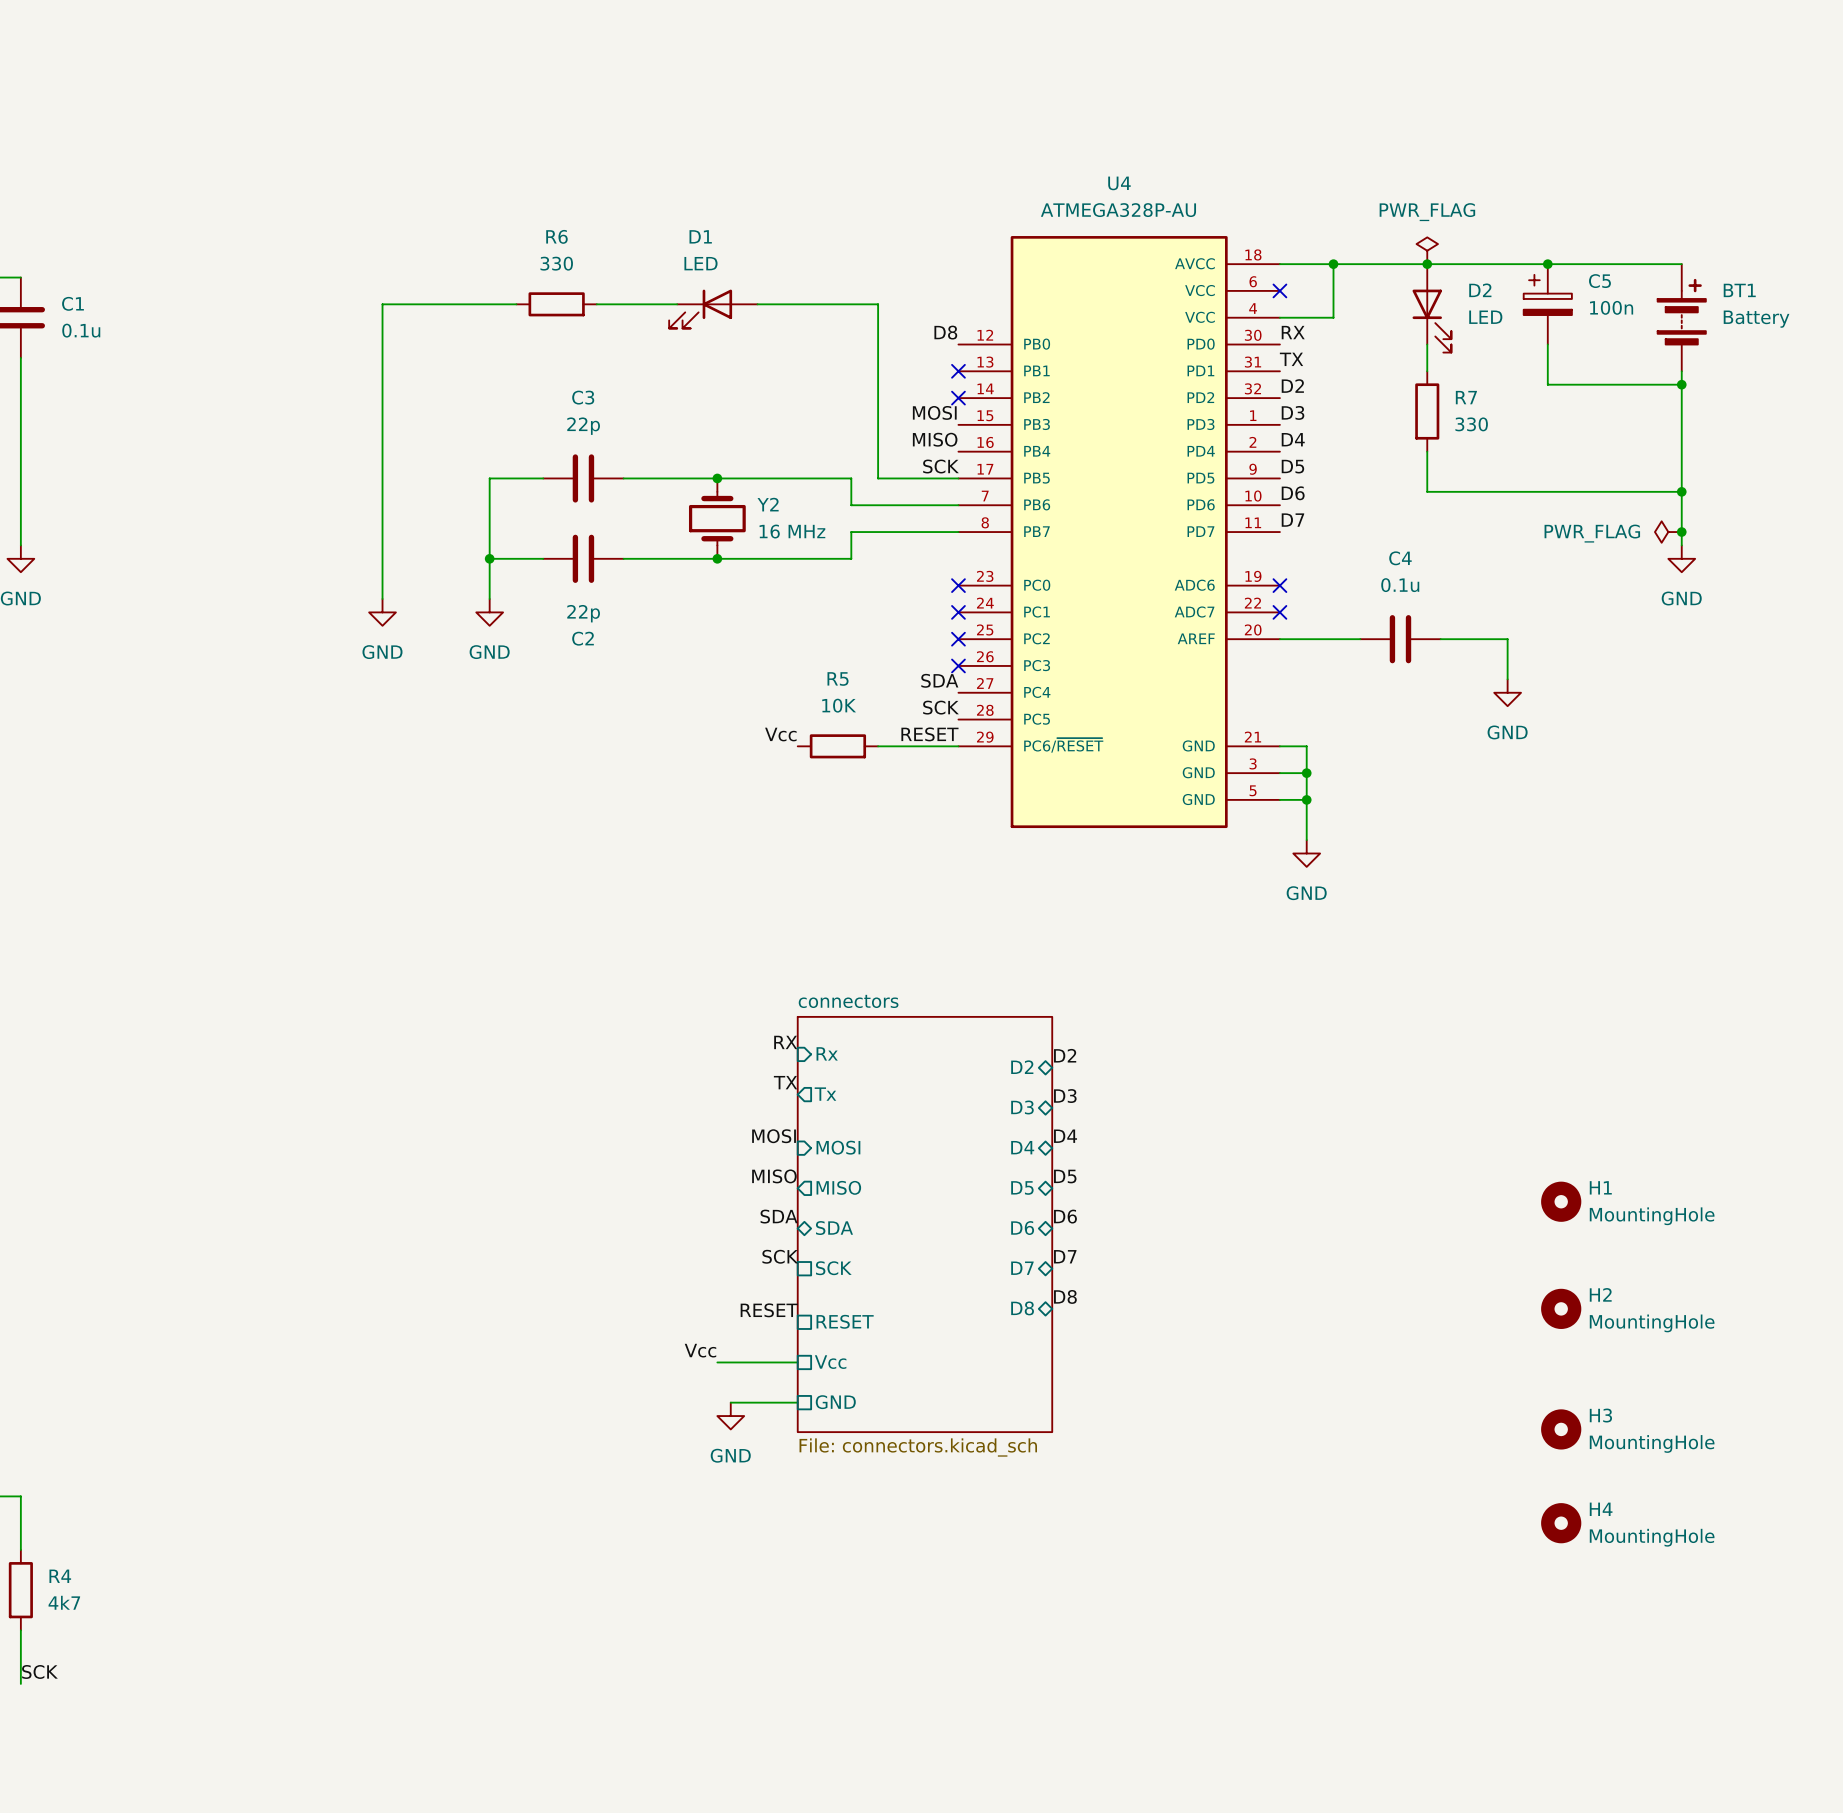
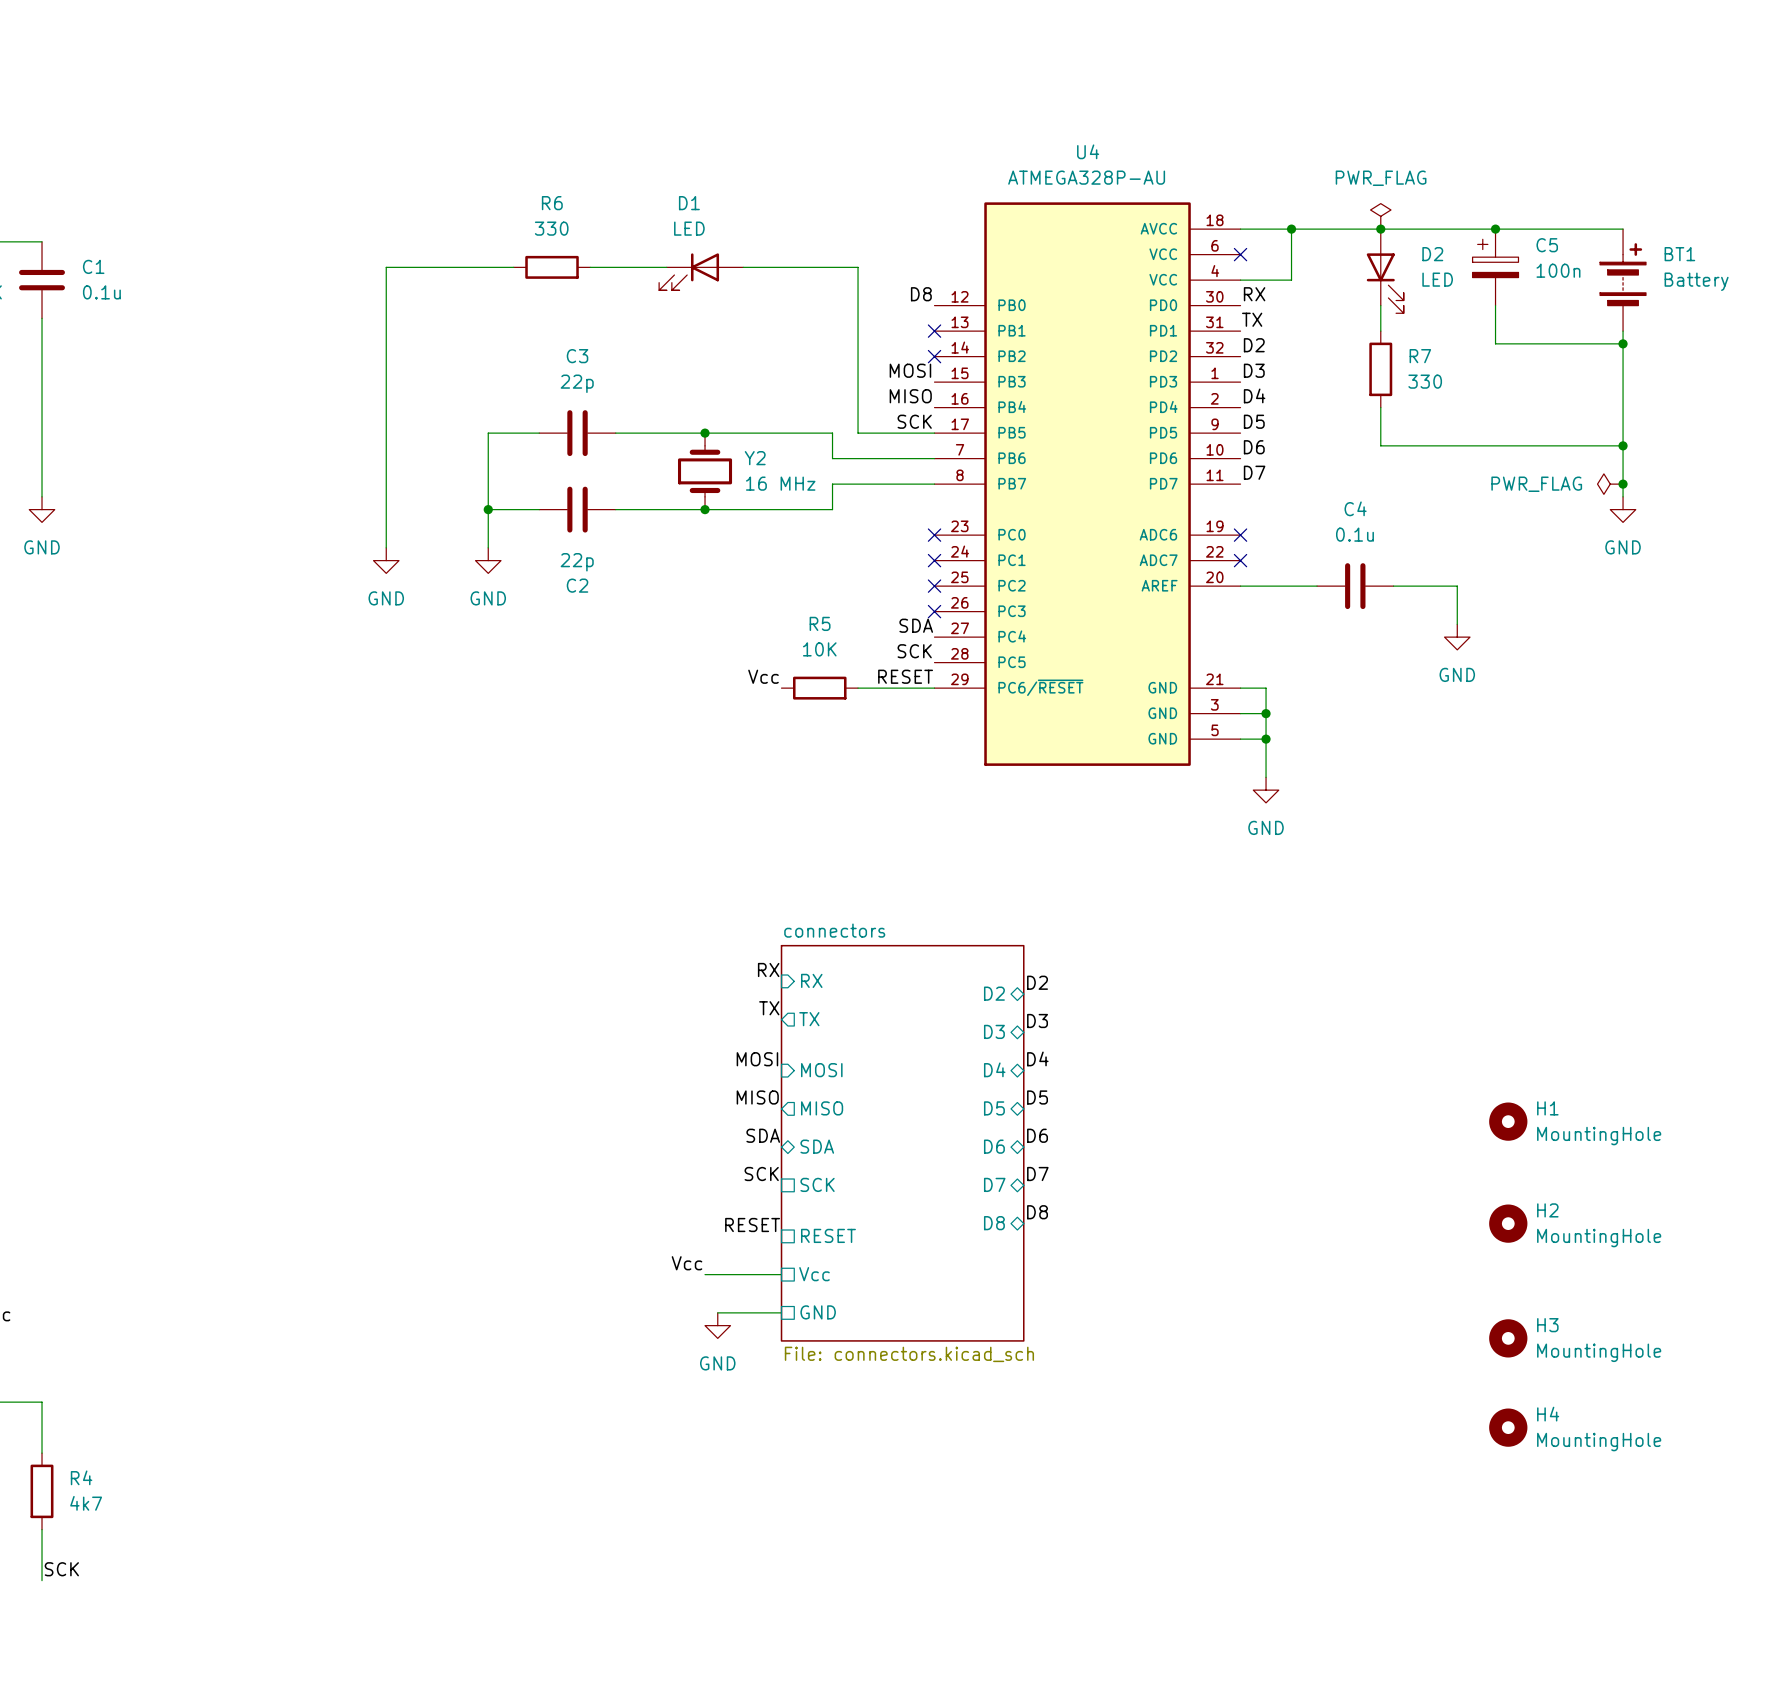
sheet pin: Rx (827, 1053) -> RX (811, 980)
sheet pin: Tx (825, 1094) -> TX (809, 1019)

